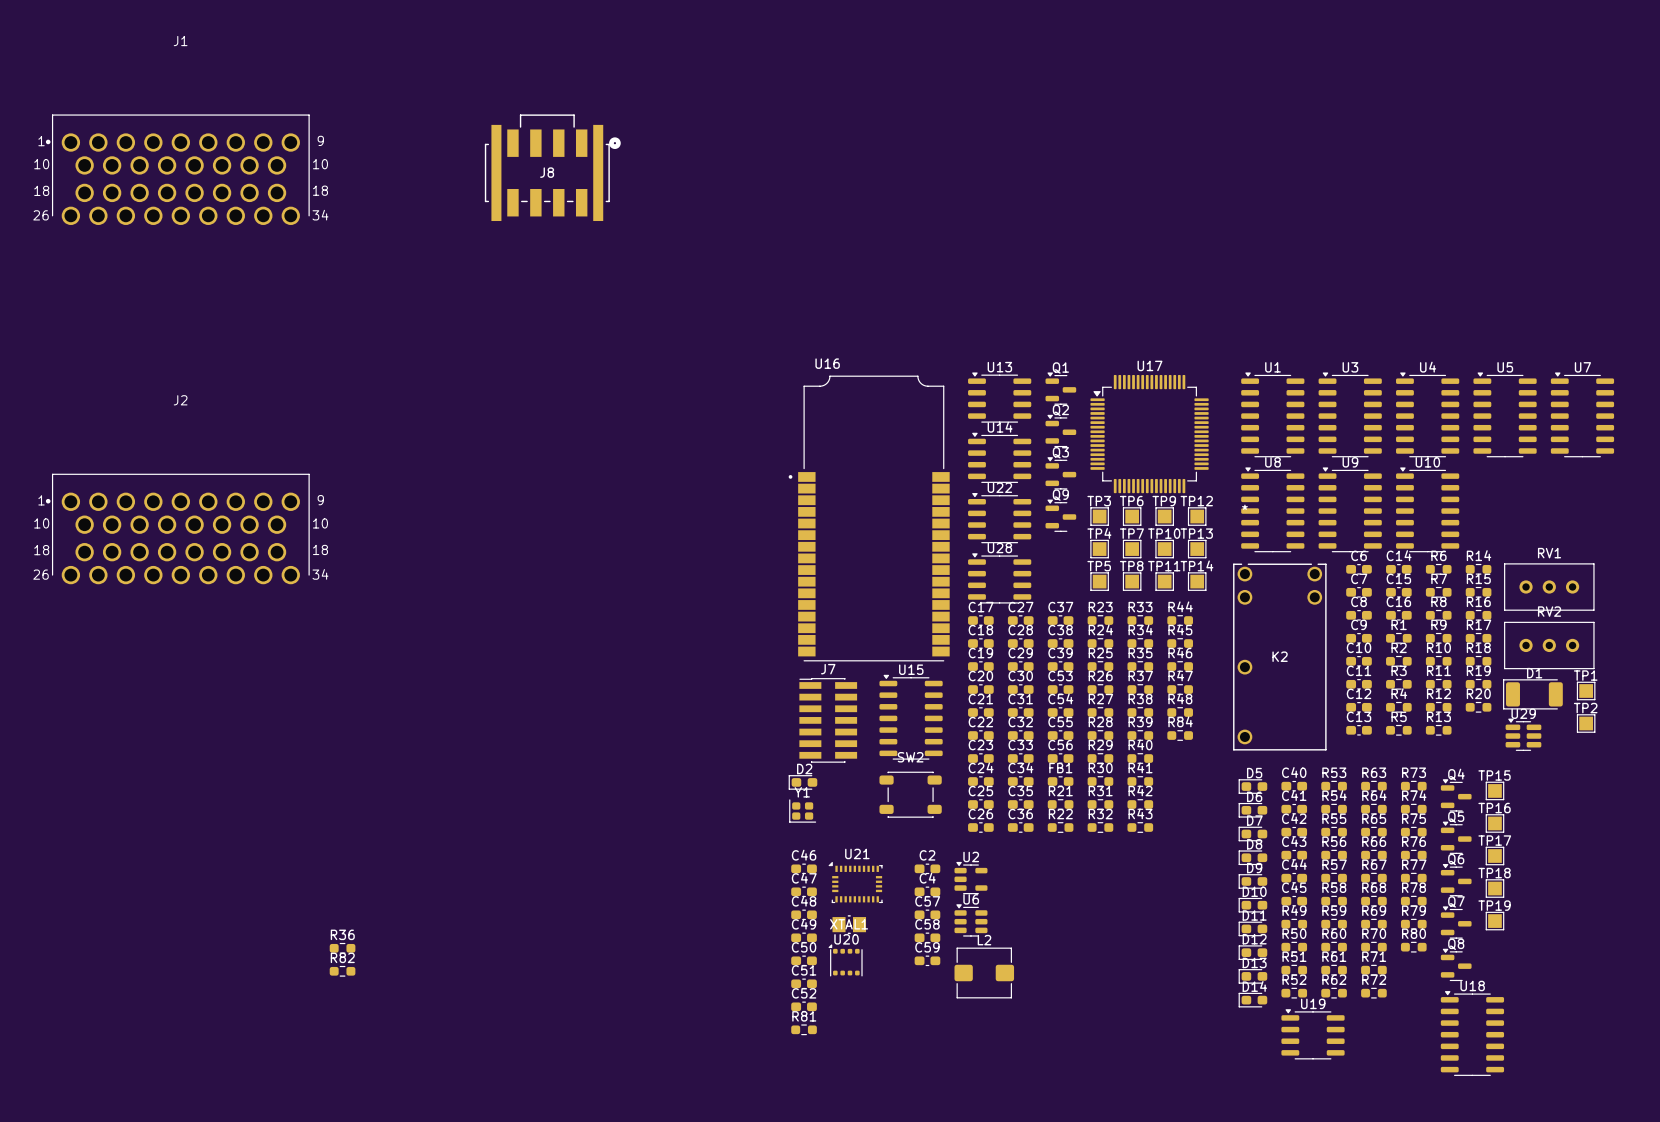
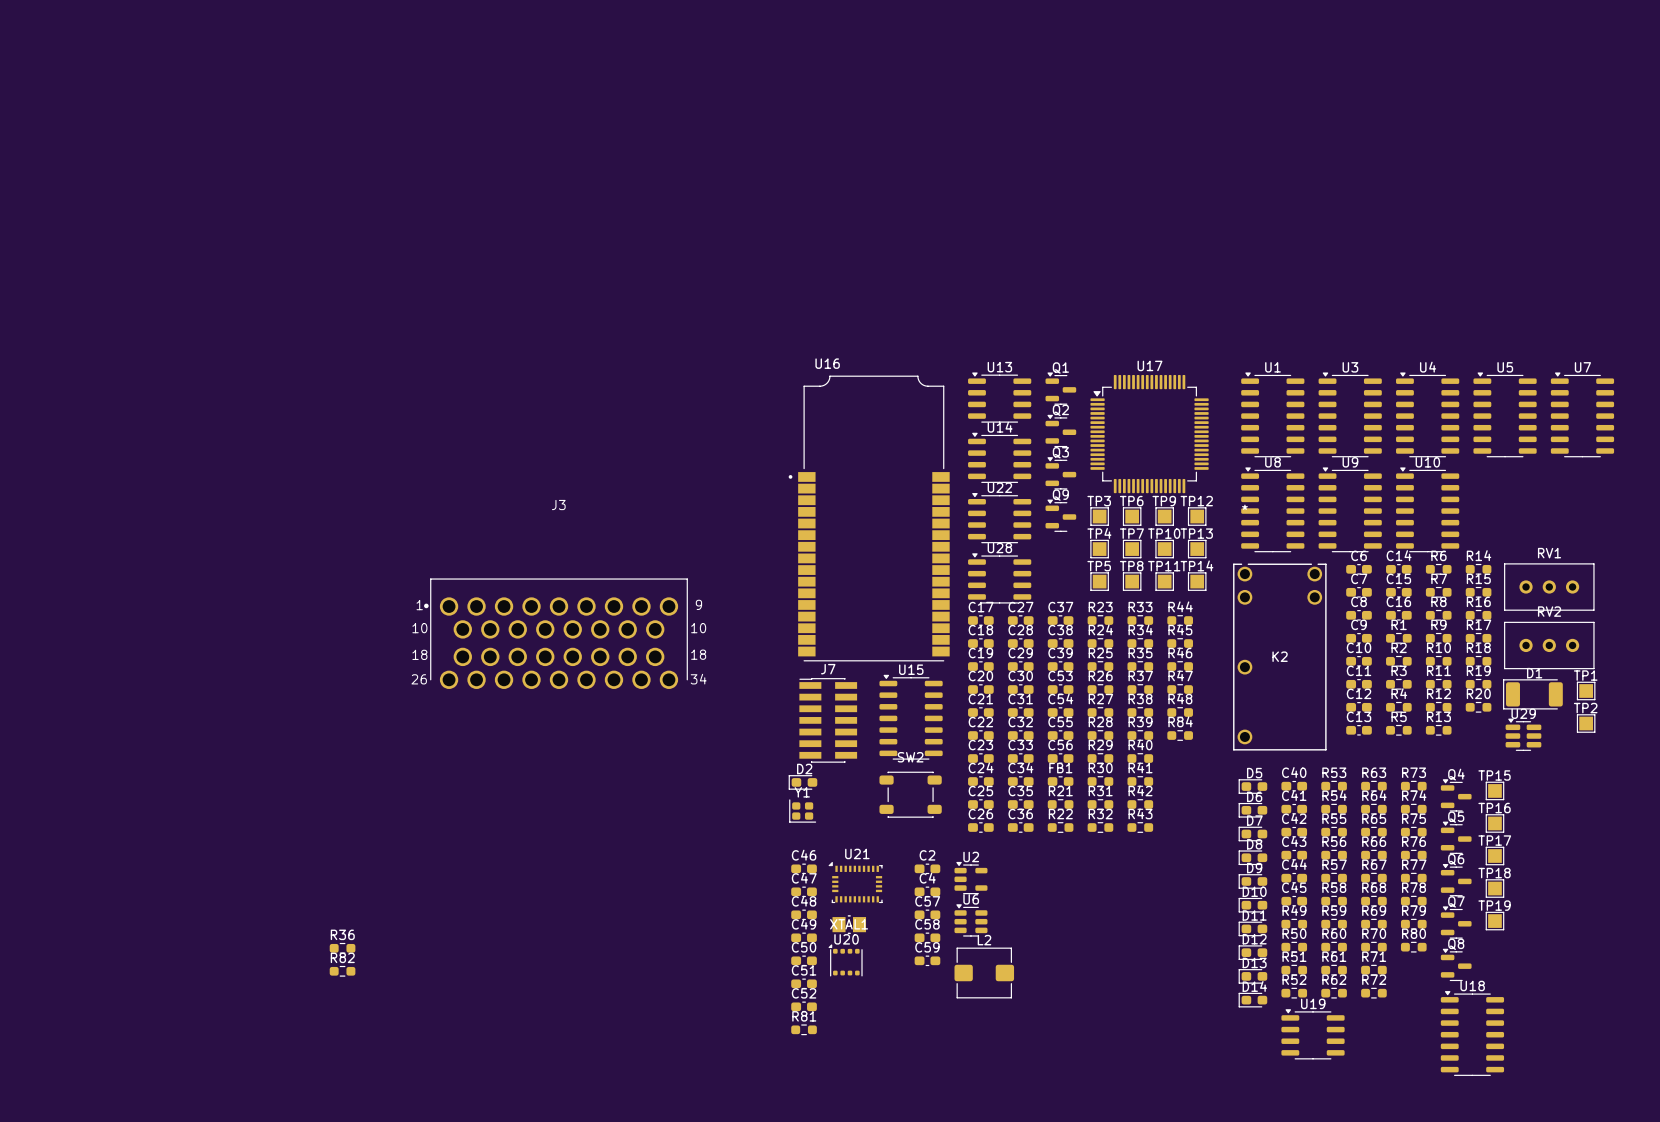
J8: (552, 167) -> none
J1: (177, 169) -> none
J2: (177, 529) -> none
J3: none -> (555, 633)

